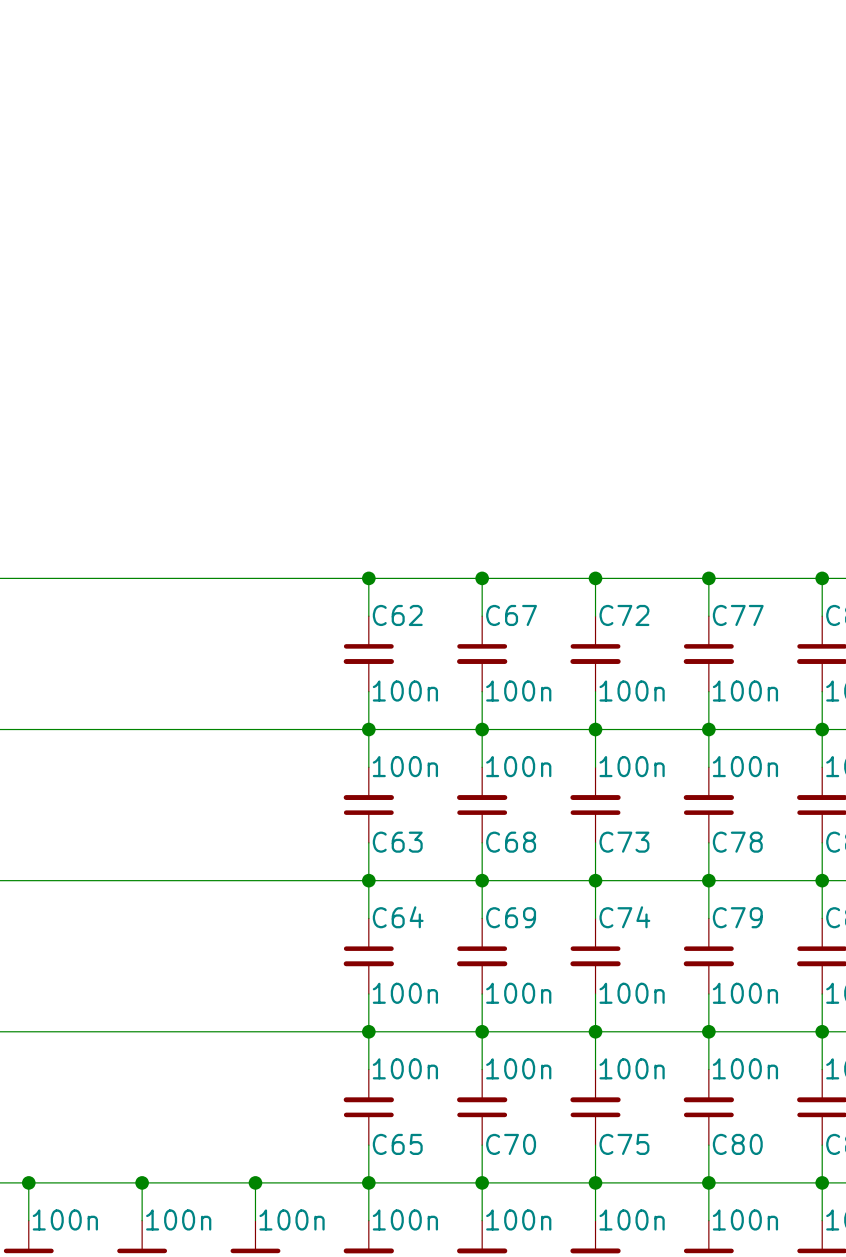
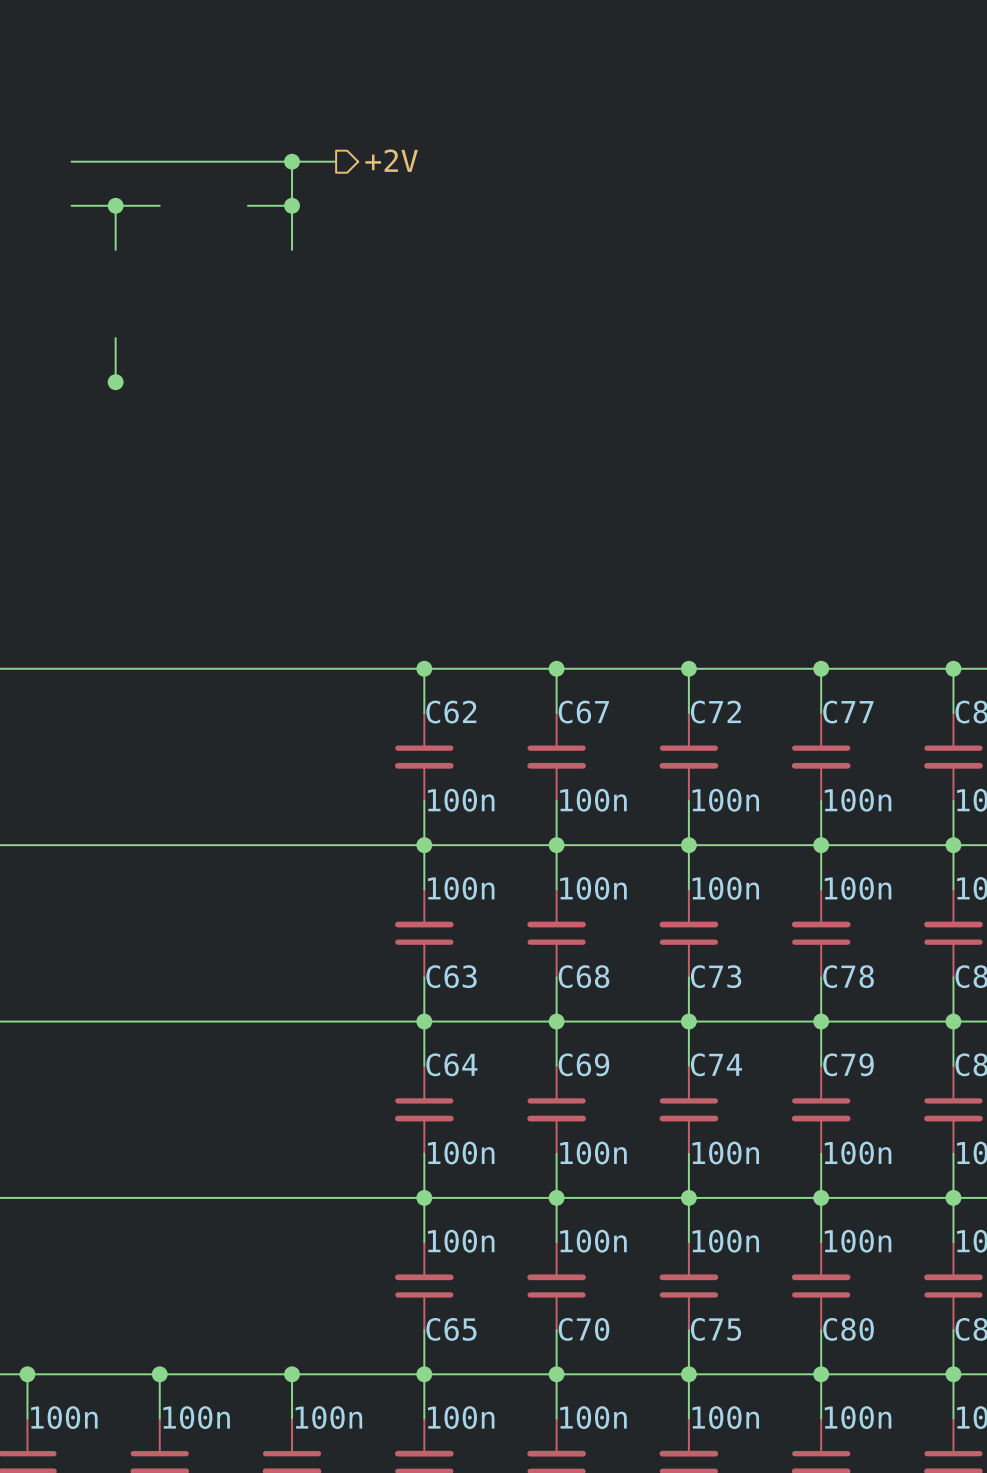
wire: none -> (71, 161) (336, 161)
wire: none -> (292, 161) (292, 249)
junction: none -> (292, 161)
hierarchical label: none -> +2V (391, 160)
wire: none -> (71, 205) (159, 205)
wire: none -> (115, 205) (115, 249)
junction: none -> (115, 205)
wire: none -> (247, 205) (292, 205)
junction: none -> (292, 205)
wire: none -> (115, 338) (115, 382)
junction: none -> (115, 382)

